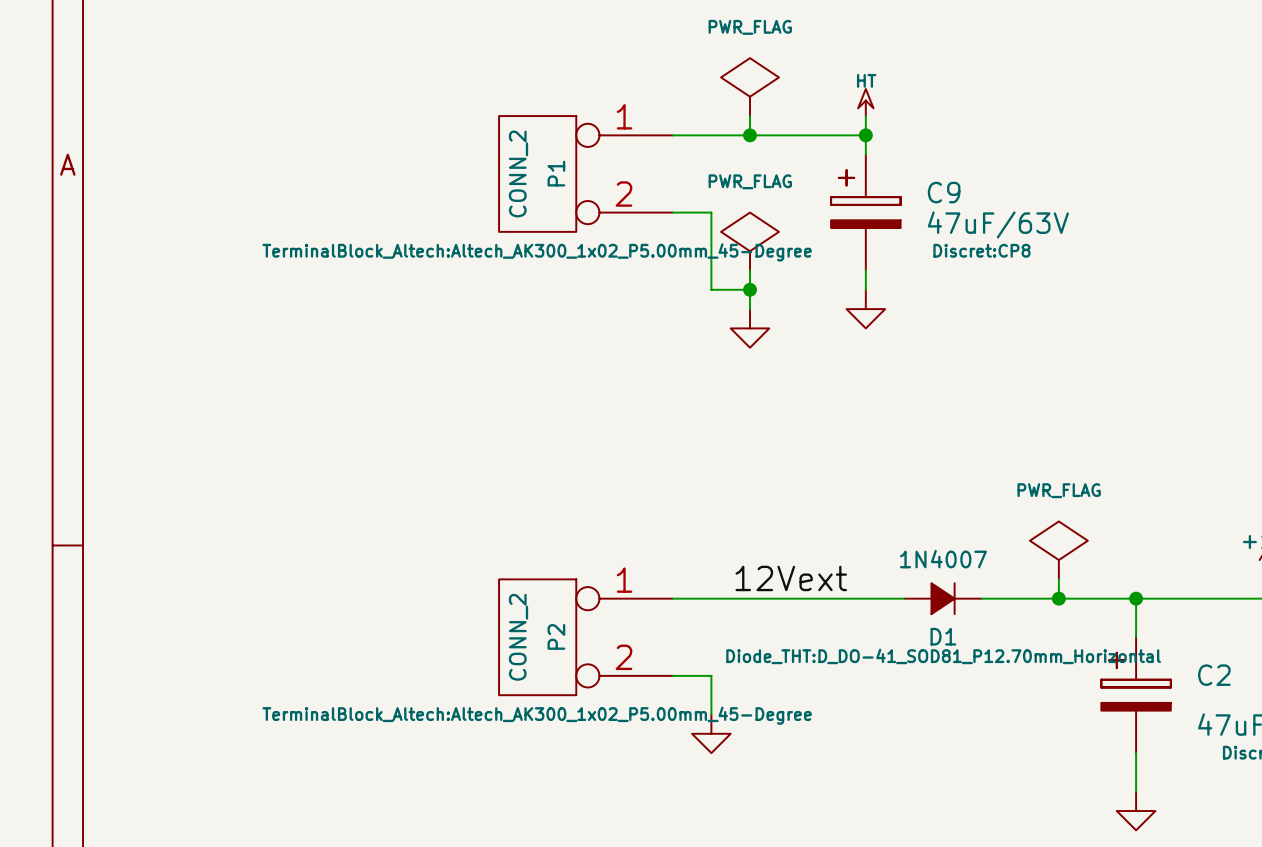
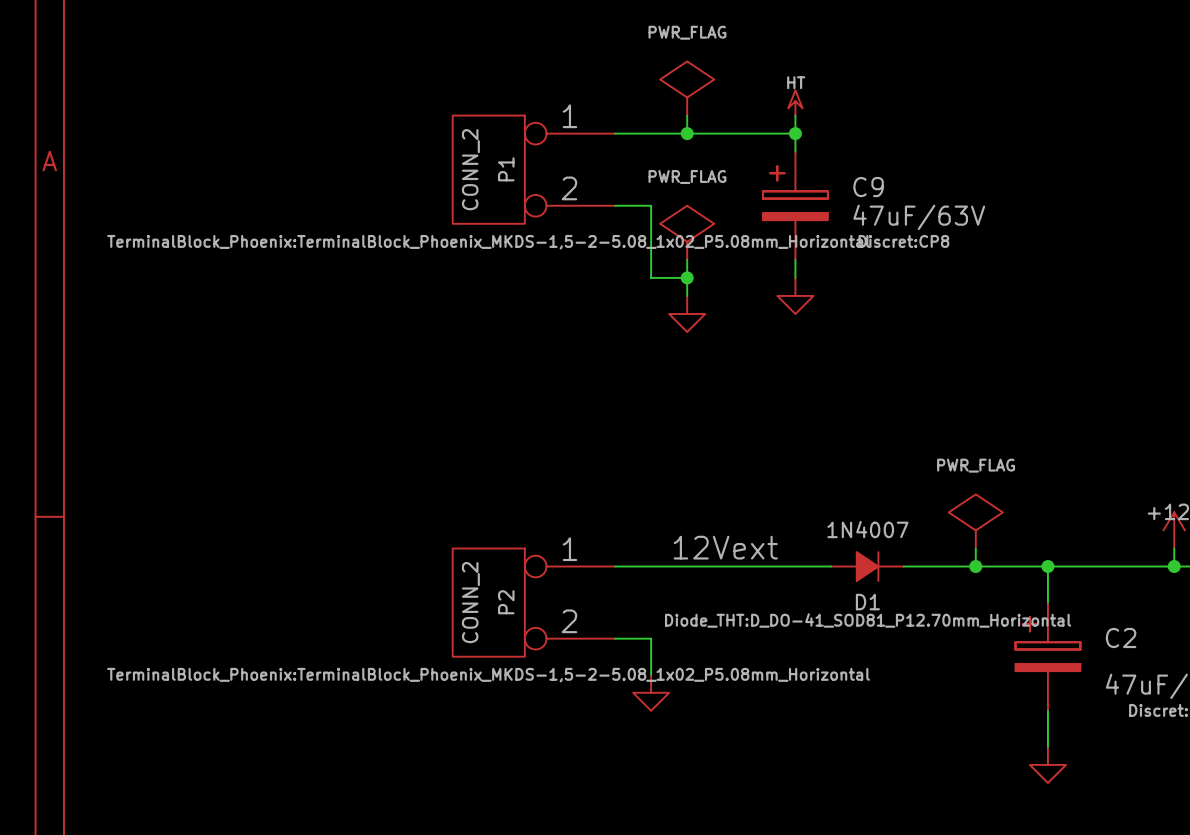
P1 text: TerminalBlock_Altech:Altech_AK300_1x02_P5.00mm_45-Degree (537, 252) -> TerminalBlock_Phoenix:TerminalBlock_Phoenix_MKDS-1,5-2-5.08_1x02_P5.08mm_Horizontal (488, 242)
P2 text: TerminalBlock_Altech:Altech_AK300_1x02_P5.00mm_45-Degree (537, 715) -> TerminalBlock_Phoenix:TerminalBlock_Phoenix_MKDS-1,5-2-5.08_1x02_P5.08mm_Horizontal (488, 675)

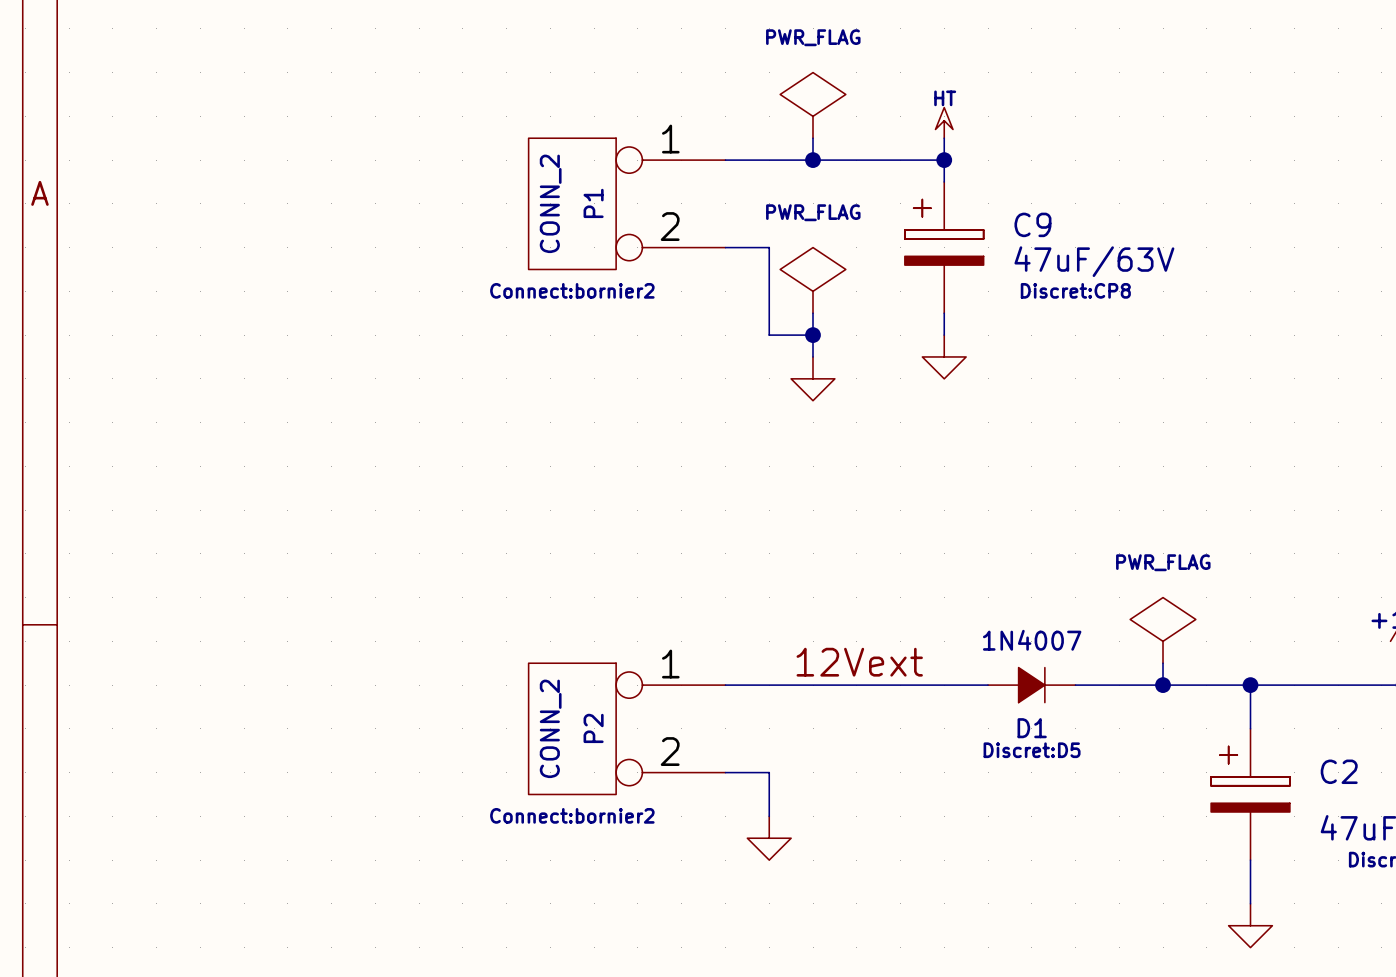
P1 text: TerminalBlock_Phoenix:TerminalBlock_Phoenix_MKDS-1,5-2-5.08_1x02_P5.08mm_Horizontal (488, 242) -> Connect:bornier2 (572, 290)
D1 text: Diode_THT:D_DO-41_SOD81_P12.70mm_Horizontal (868, 620) -> Discret:D5 (1032, 750)
P2 text: TerminalBlock_Phoenix:TerminalBlock_Phoenix_MKDS-1,5-2-5.08_1x02_P5.08mm_Horizontal (488, 675) -> Connect:bornier2 (572, 815)

